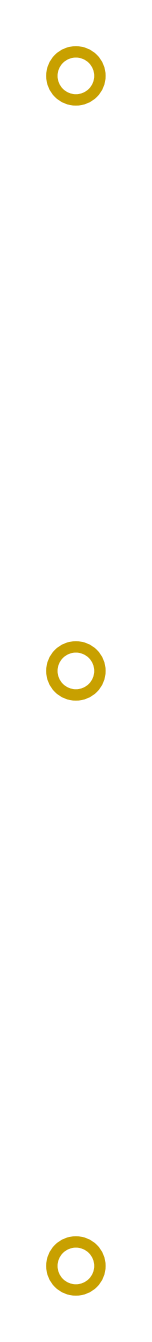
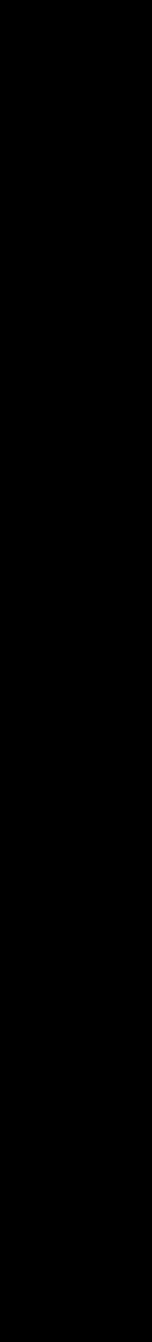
part: (75, 75) -> none
part: (75, 670) -> none
part: (75, 1265) -> none

